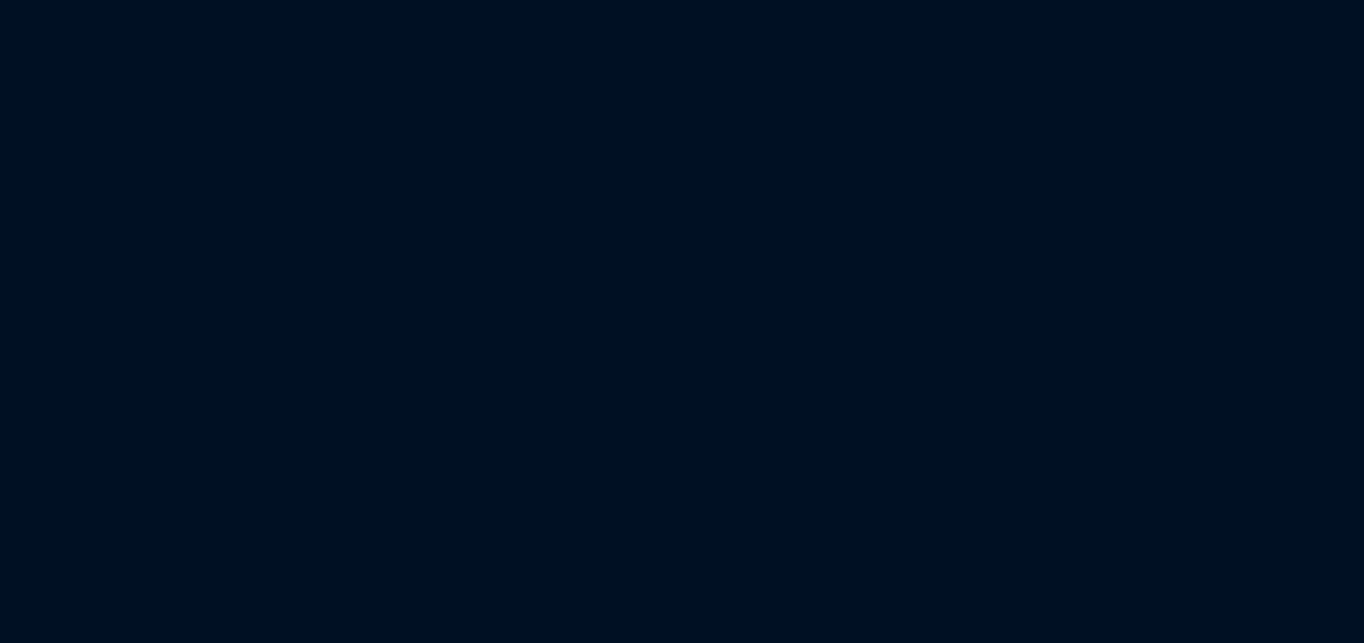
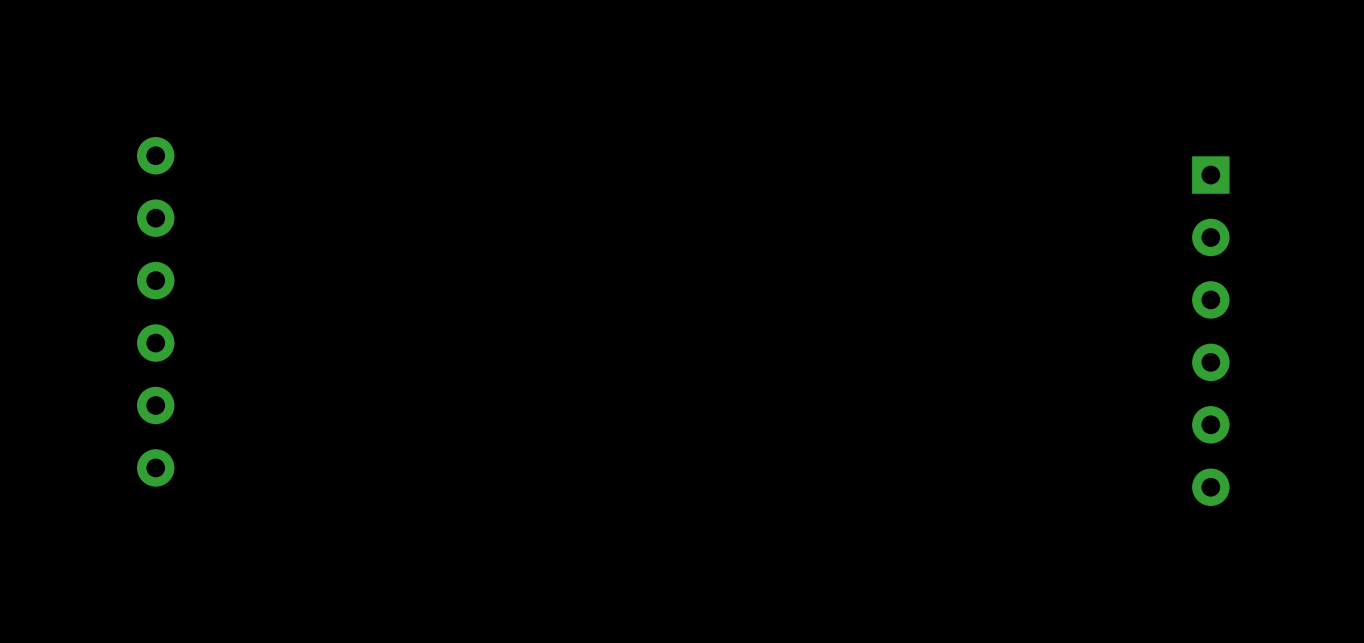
part: none -> (155, 311)
part: none -> (1210, 331)

